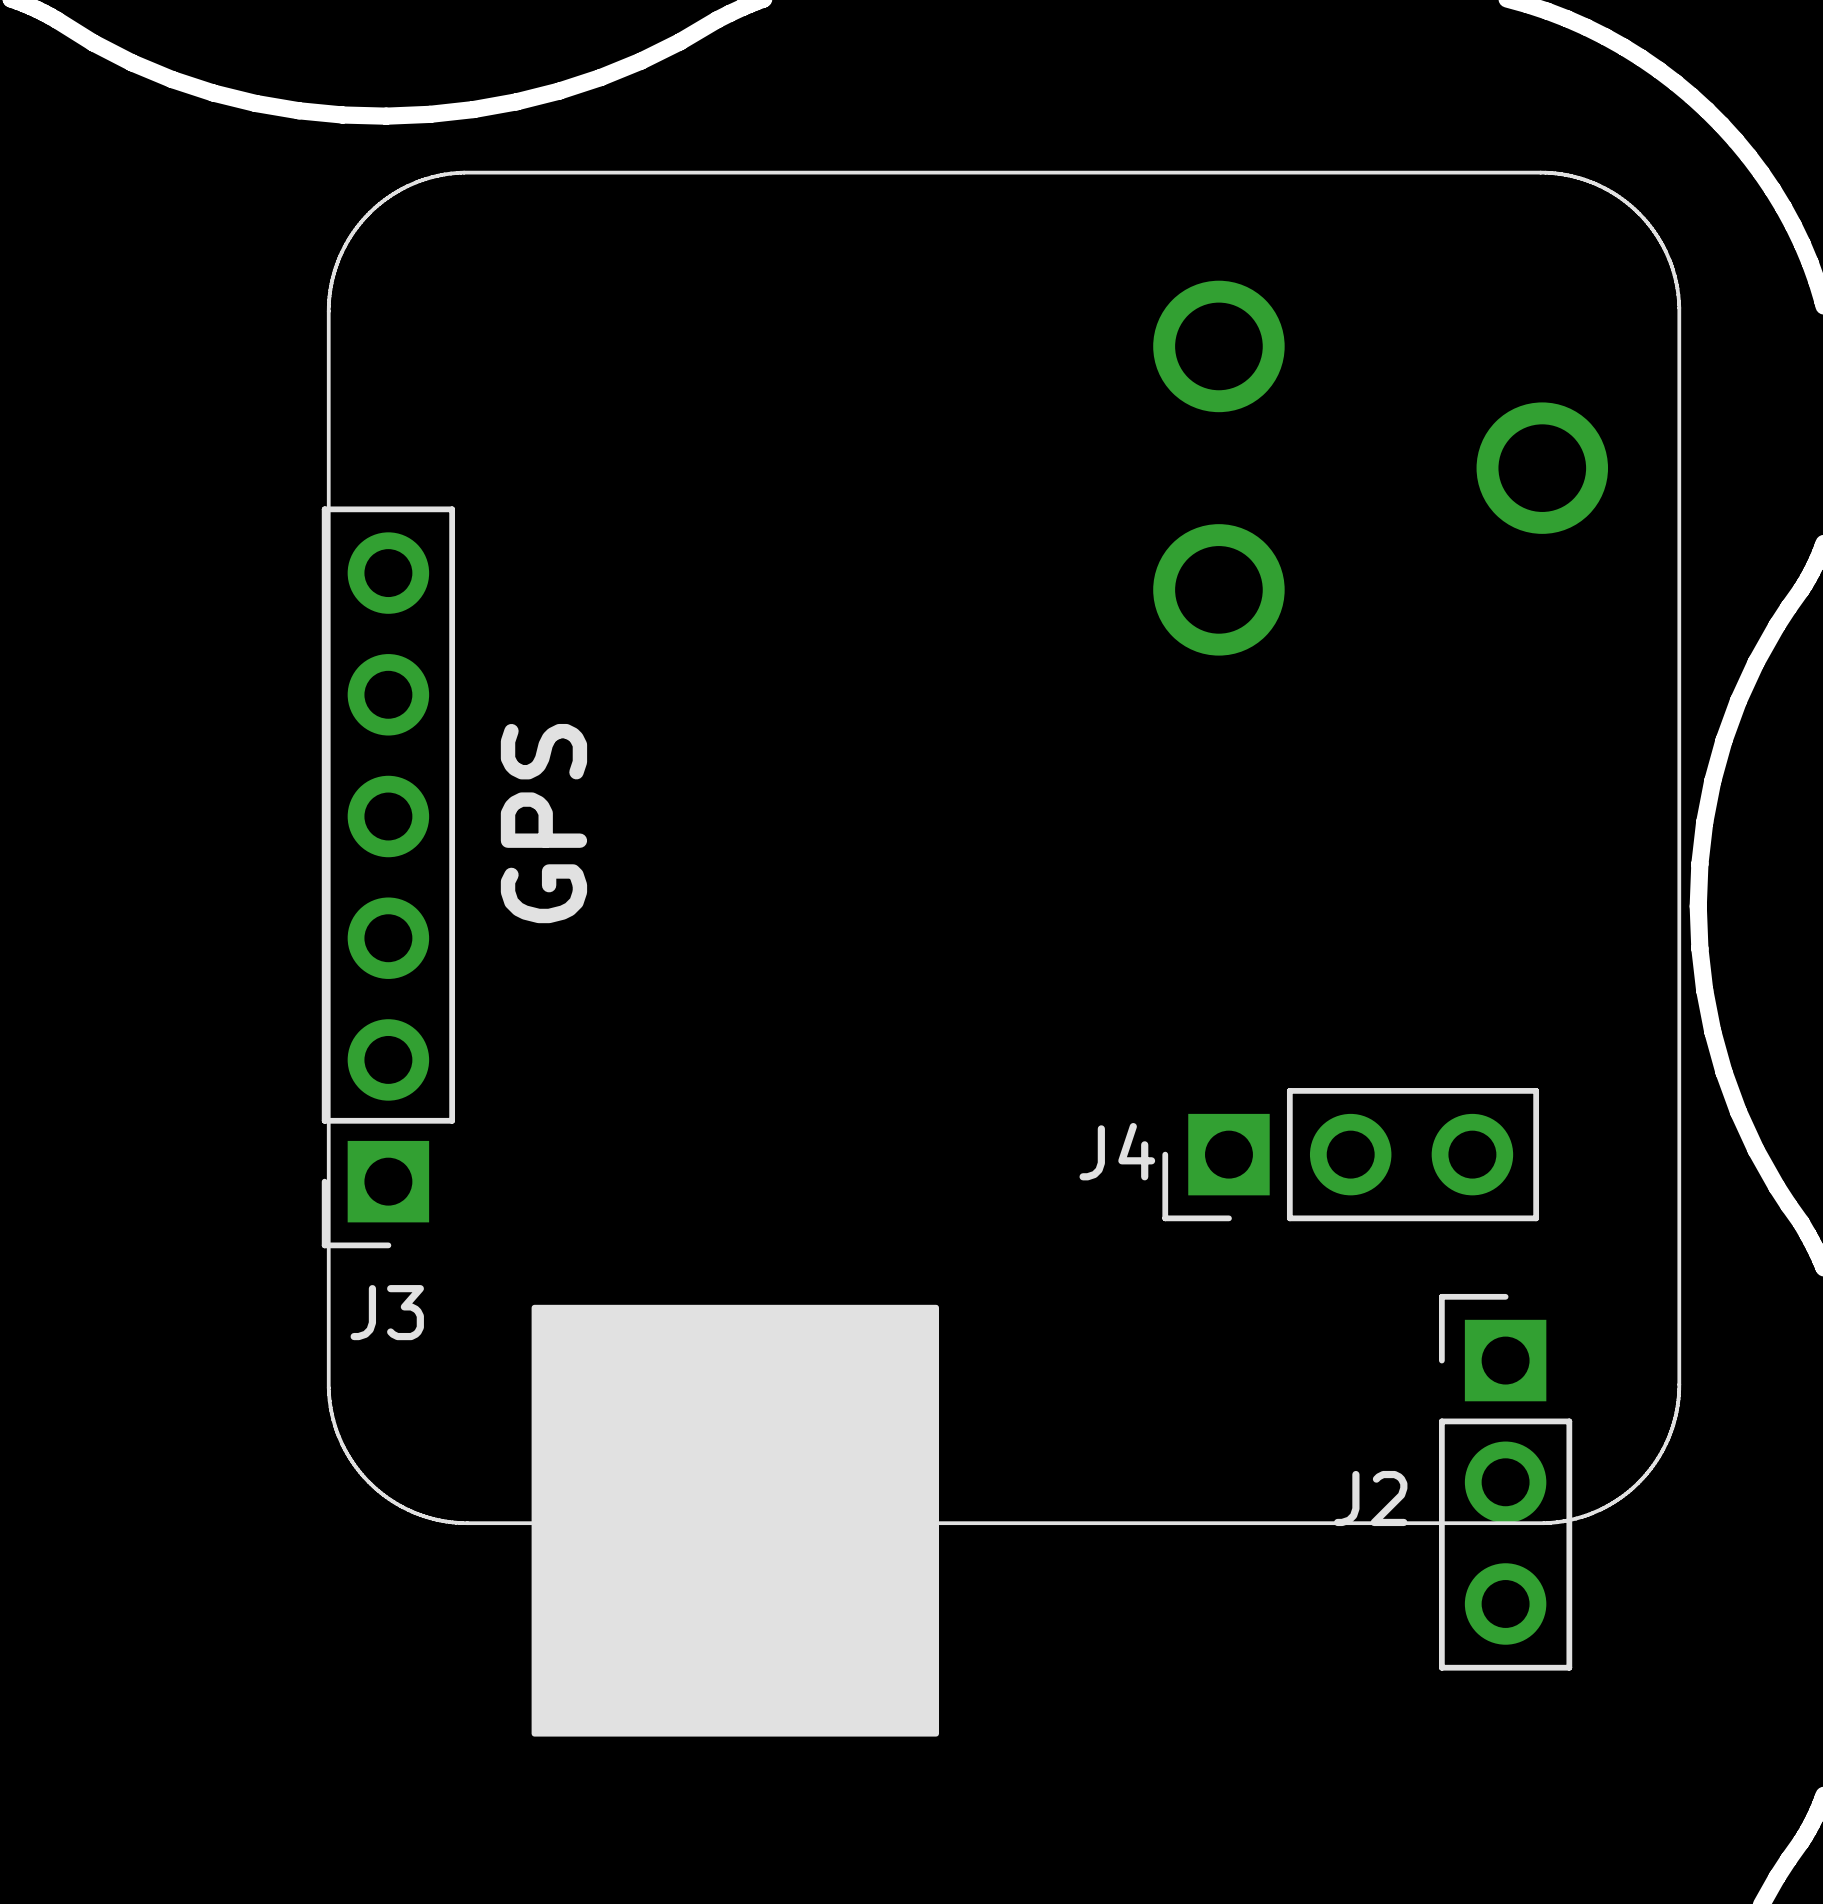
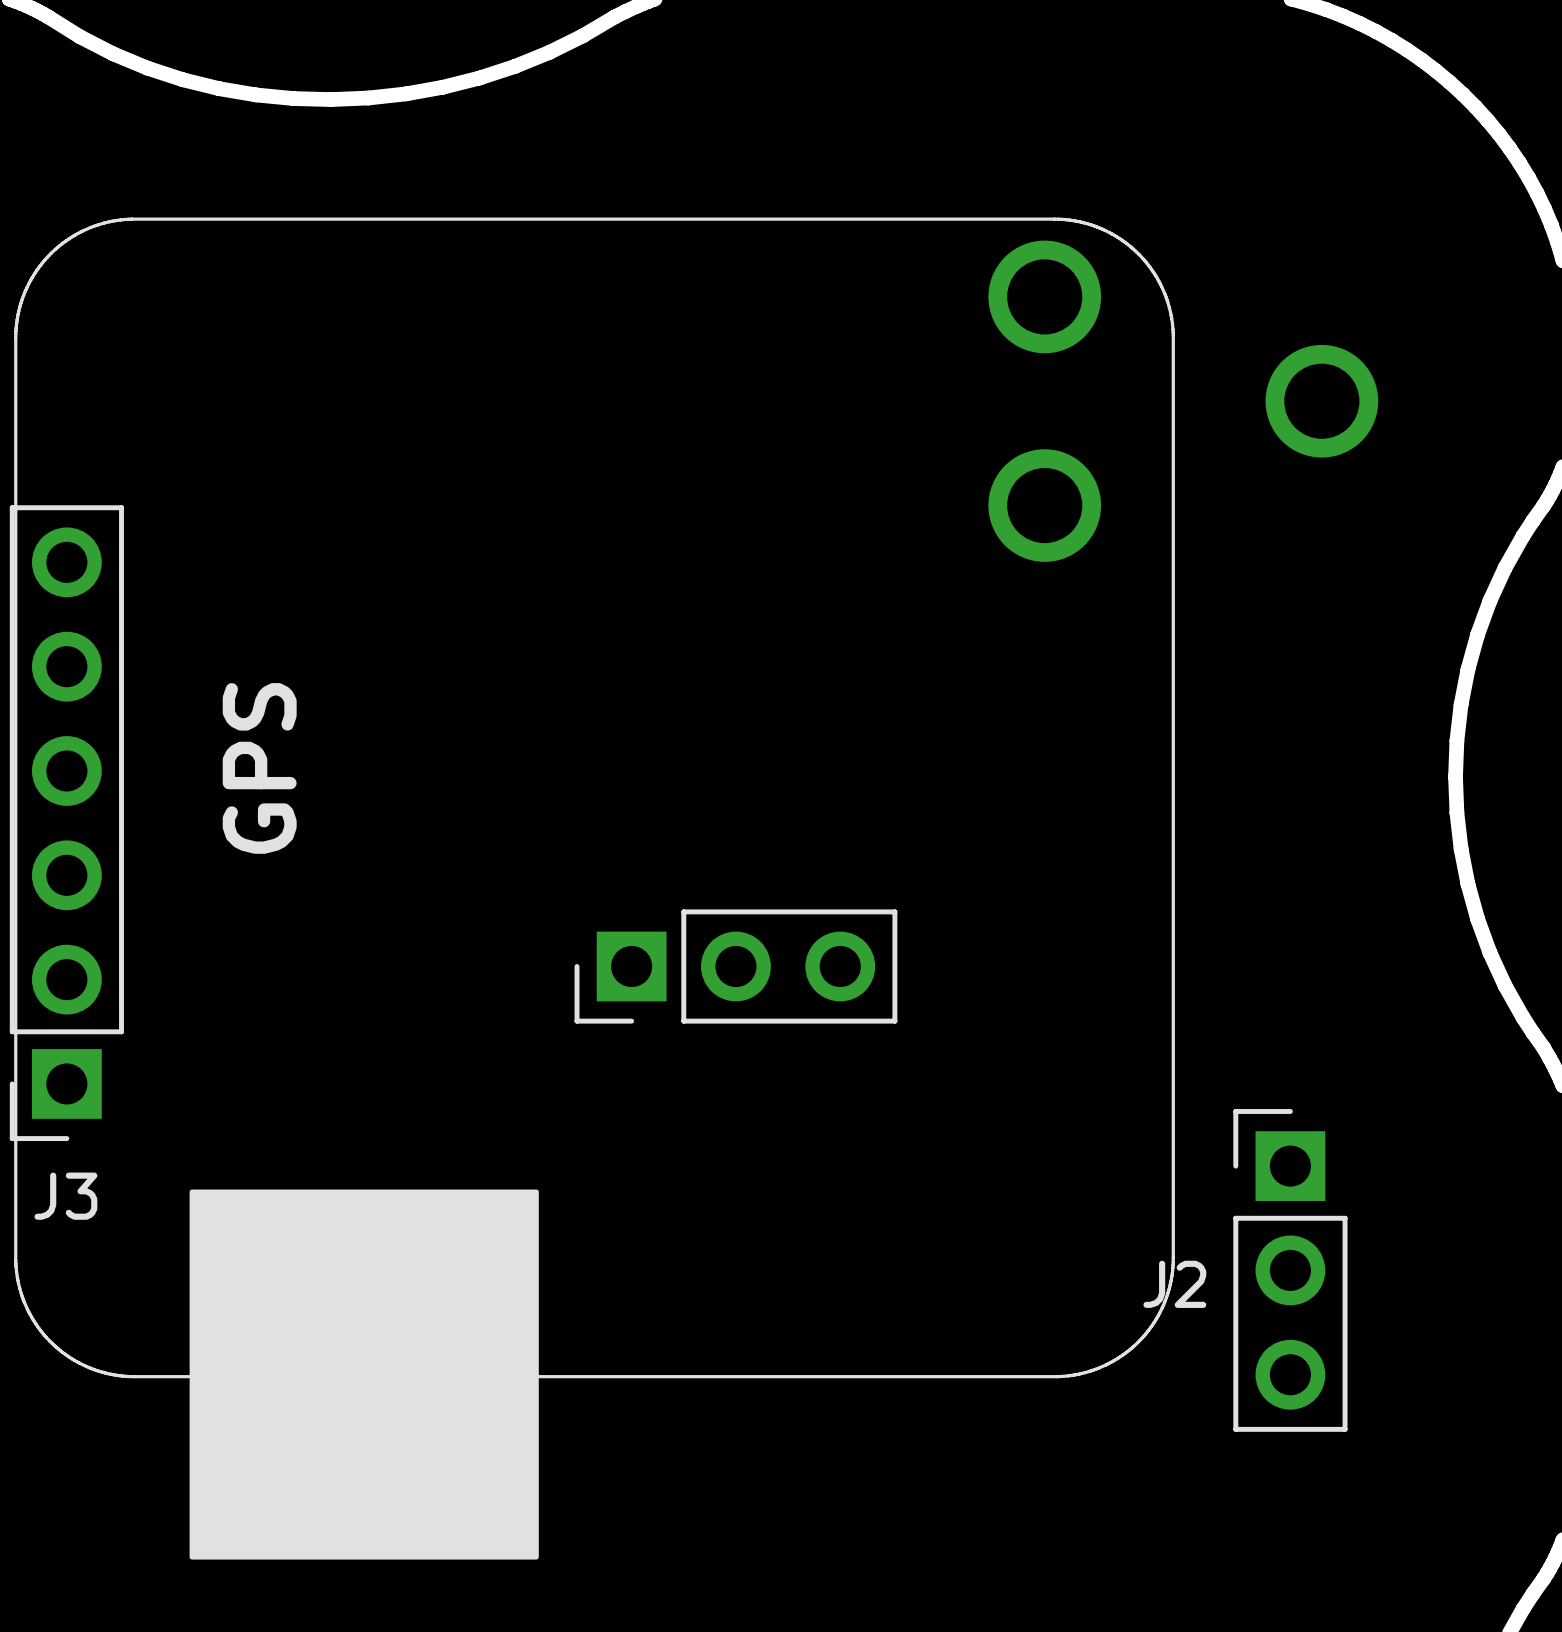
line: (460, 172) (431, 177) (407, 186) (387, 197) (369, 212) (353, 232) (341, 252) (332, 277) (329, 299) (328, 1387) (331, 1413) (338, 1435) (350, 1458) (364, 1477) (386, 1496) (411, 1511) (439, 1520) (467, 1523) (1543, 1523) (1569, 1520) (1591, 1513) (1615, 1501) (1633, 1487) (1652, 1465) (1667, 1440) (1676, 1412) (1679, 1384) (1679, 307) (1676, 281) (1669, 260) (1657, 236) (1643, 218) (1624, 200) (1599, 185) (1571, 176) (1545, 172) (460, 172) -> (131, 219) (109, 221) (90, 227) (70, 237) (51, 253) (36, 270) (26, 287) (19, 308) (16, 328) (15, 1260) (18, 1282) (24, 1301) (34, 1321) (46, 1337) (64, 1354) (86, 1366) (110, 1374) (134, 1376) (1057, 1376) (1079, 1374) (1098, 1368) (1118, 1358) (1133, 1346) (1150, 1327) (1163, 1305) (1170, 1281) (1173, 1257) (1173, 335) (1170, 312) (1164, 294) (1154, 274) (1142, 258) (1126, 243) (1104, 230) (1080, 222) (1058, 219) (131, 219)
text position: GPS (543, 823) -> GPS (259, 768)
J3 position: (388, 877) -> (66, 823)
part: none -> (735, 966)
J4: (1350, 1154) -> none
drawing position: (735, 1520) -> (364, 1374)

